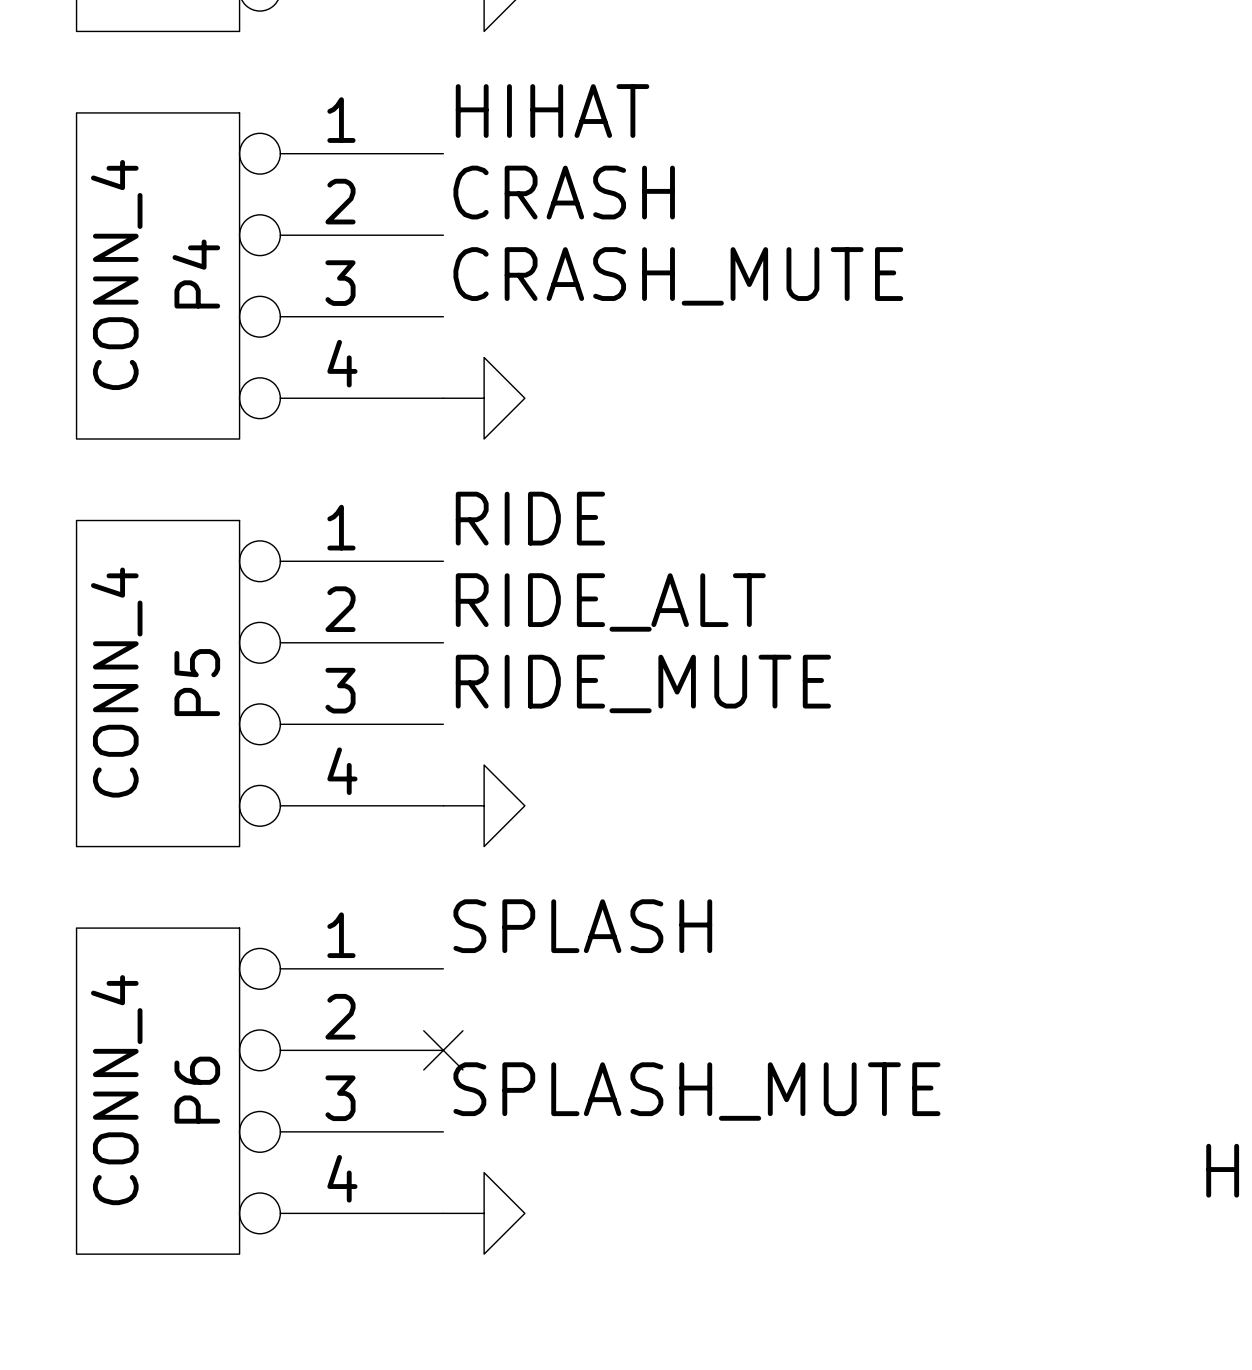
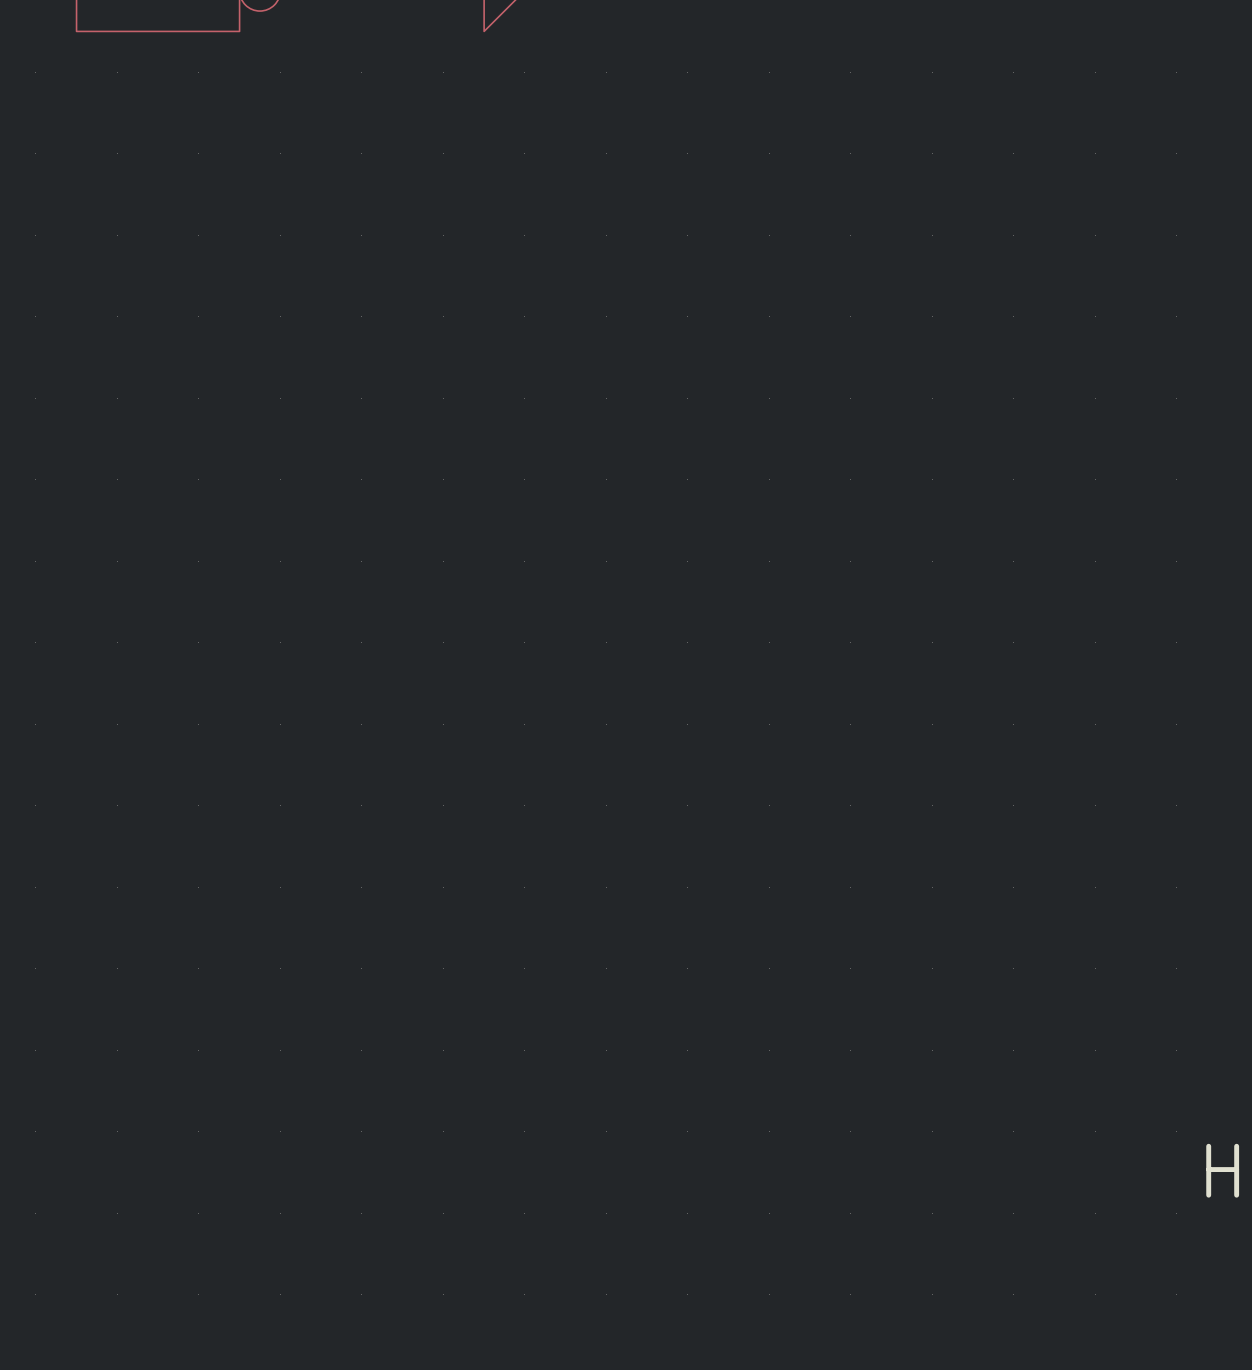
label: HIHAT (552, 111) -> none
label: CRASH (564, 192) -> none
P4: CONN_4 (259, 275) -> none
label: CRASH_MUTE (678, 276) -> none
power symbol: (484, 398) -> none
label: RIDE (530, 518) -> none
label: RIDE_ALT (610, 602) -> none
P5: CONN_4 (259, 683) -> none
label: RIDE_MUTE (643, 683) -> none
power symbol: (484, 805) -> none
label: SPLASH (582, 926) -> none
no-connect mark: (443, 1050) -> none
P6: CONN_4 (259, 1091) -> none
label: SPLASH_MUTE (696, 1091) -> none
power symbol: (484, 1213) -> none

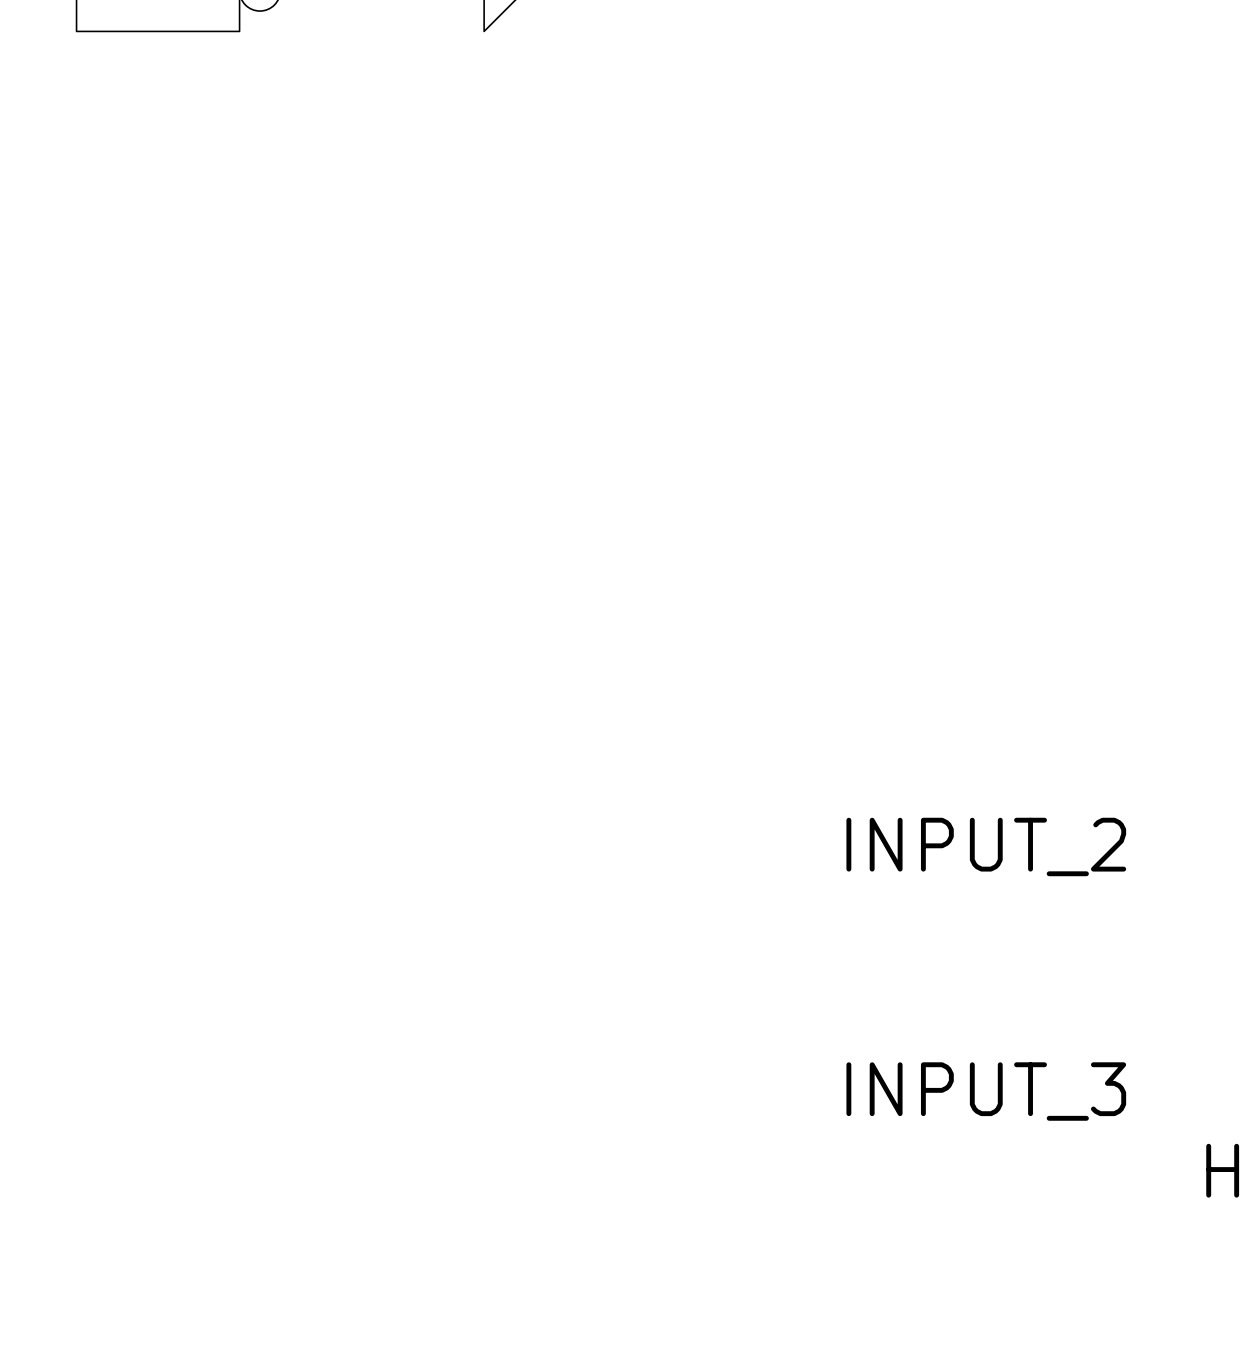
label: none -> INPUT_2 (986, 846)
label: none -> INPUT_3 (986, 1091)

